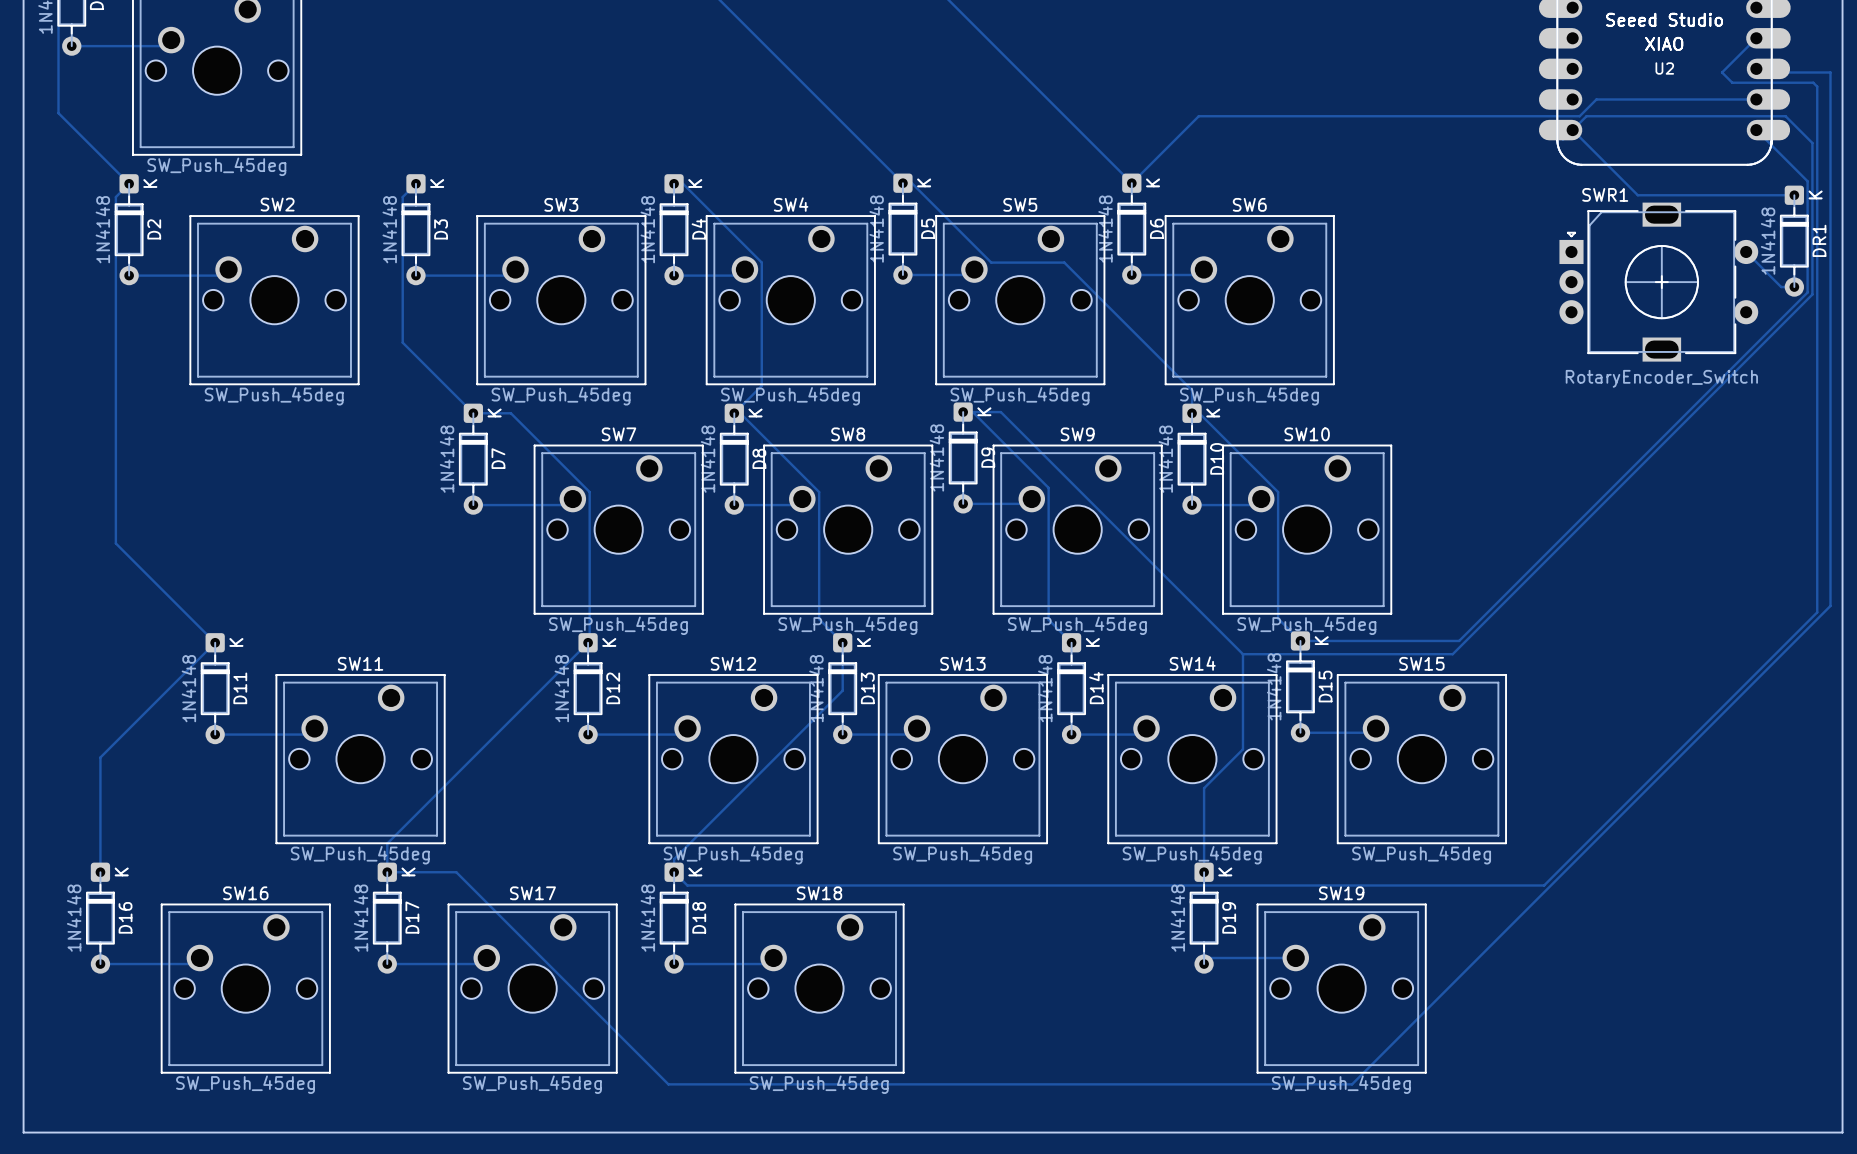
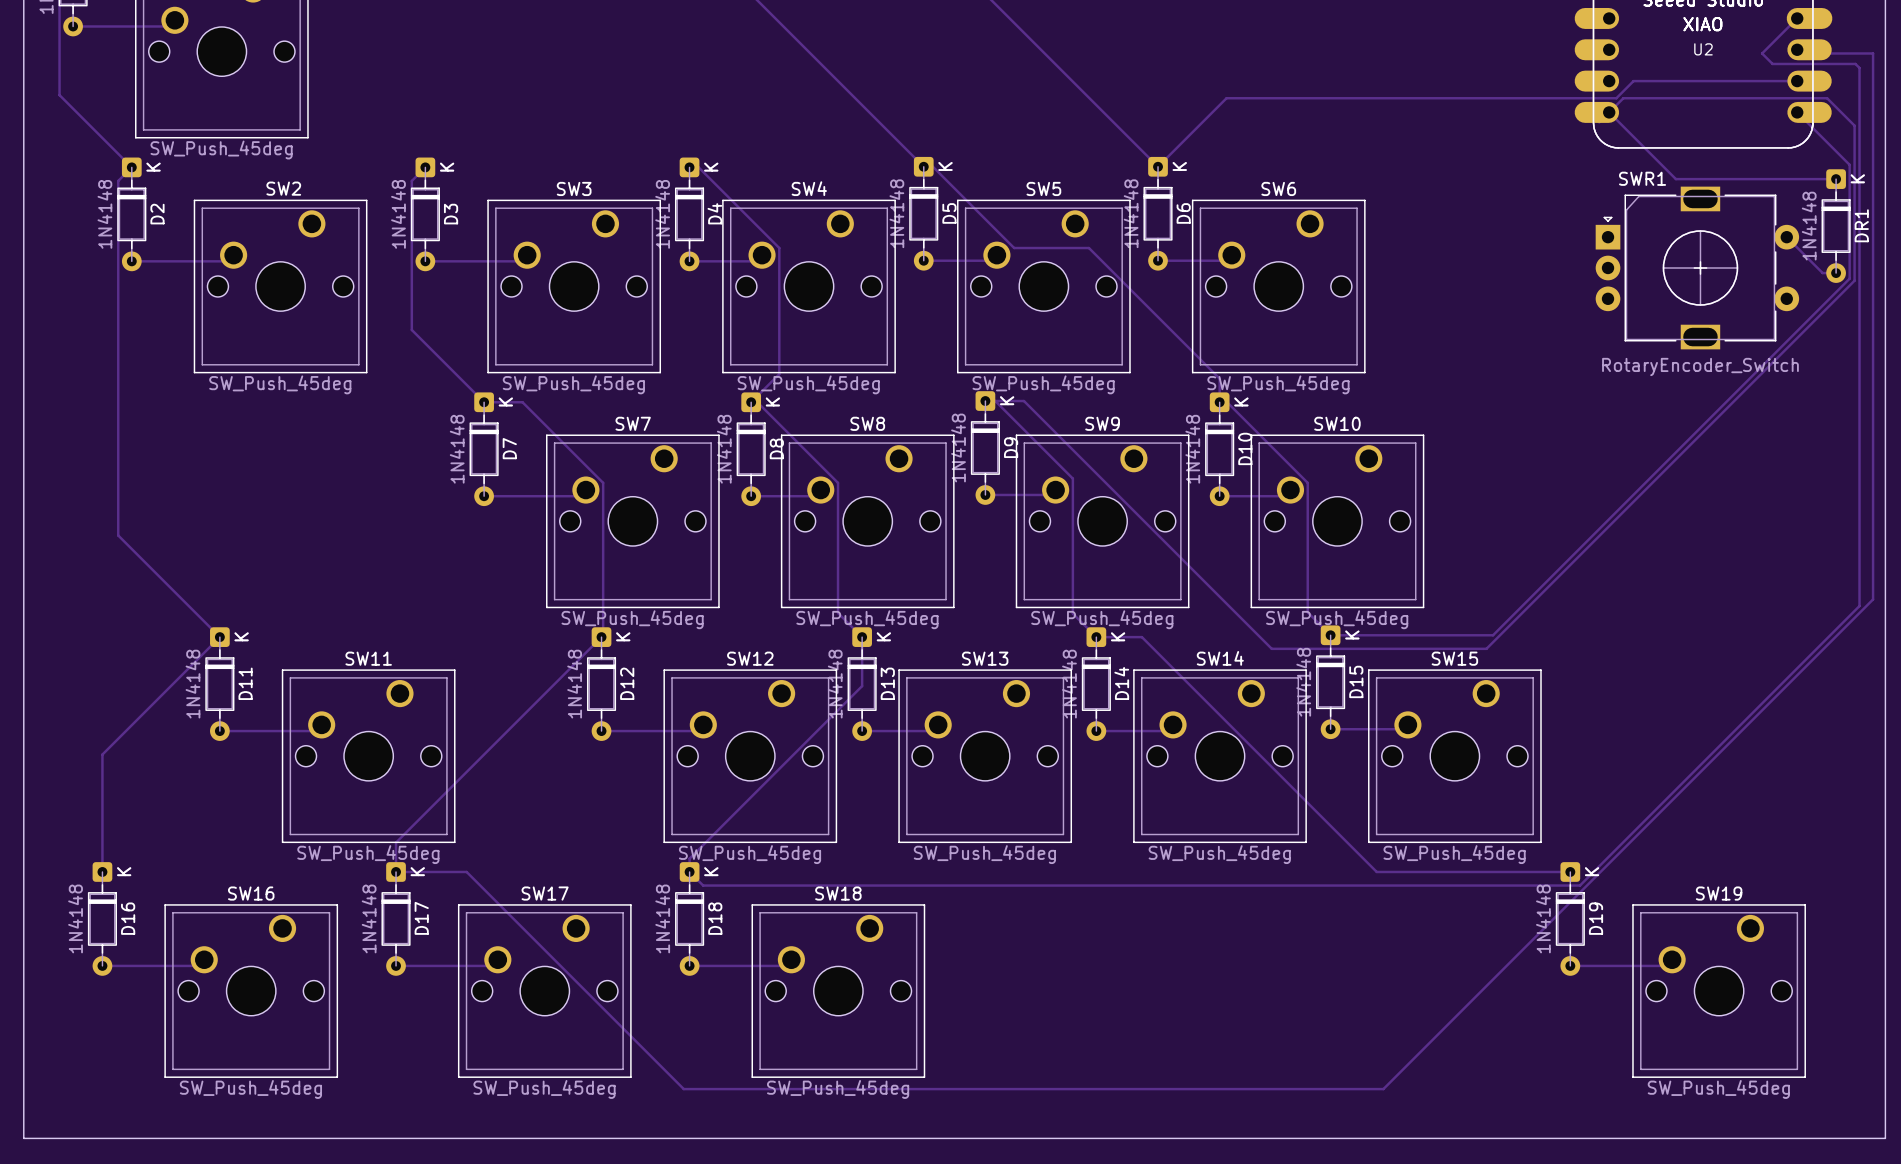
track: none -> (1096, 637) (1141, 637) (1376, 871) (1570, 871)
track: (1242, 654) (1242, 749) (1204, 788) (1204, 872) -> none
D19 position: (1204, 918) -> (1570, 918)
track: (1295, 958) (1210, 958) (1204, 964) -> none
track: none -> (1672, 959) (1665, 965) (1570, 965)
SW19 position: (1341, 988) -> (1719, 991)

